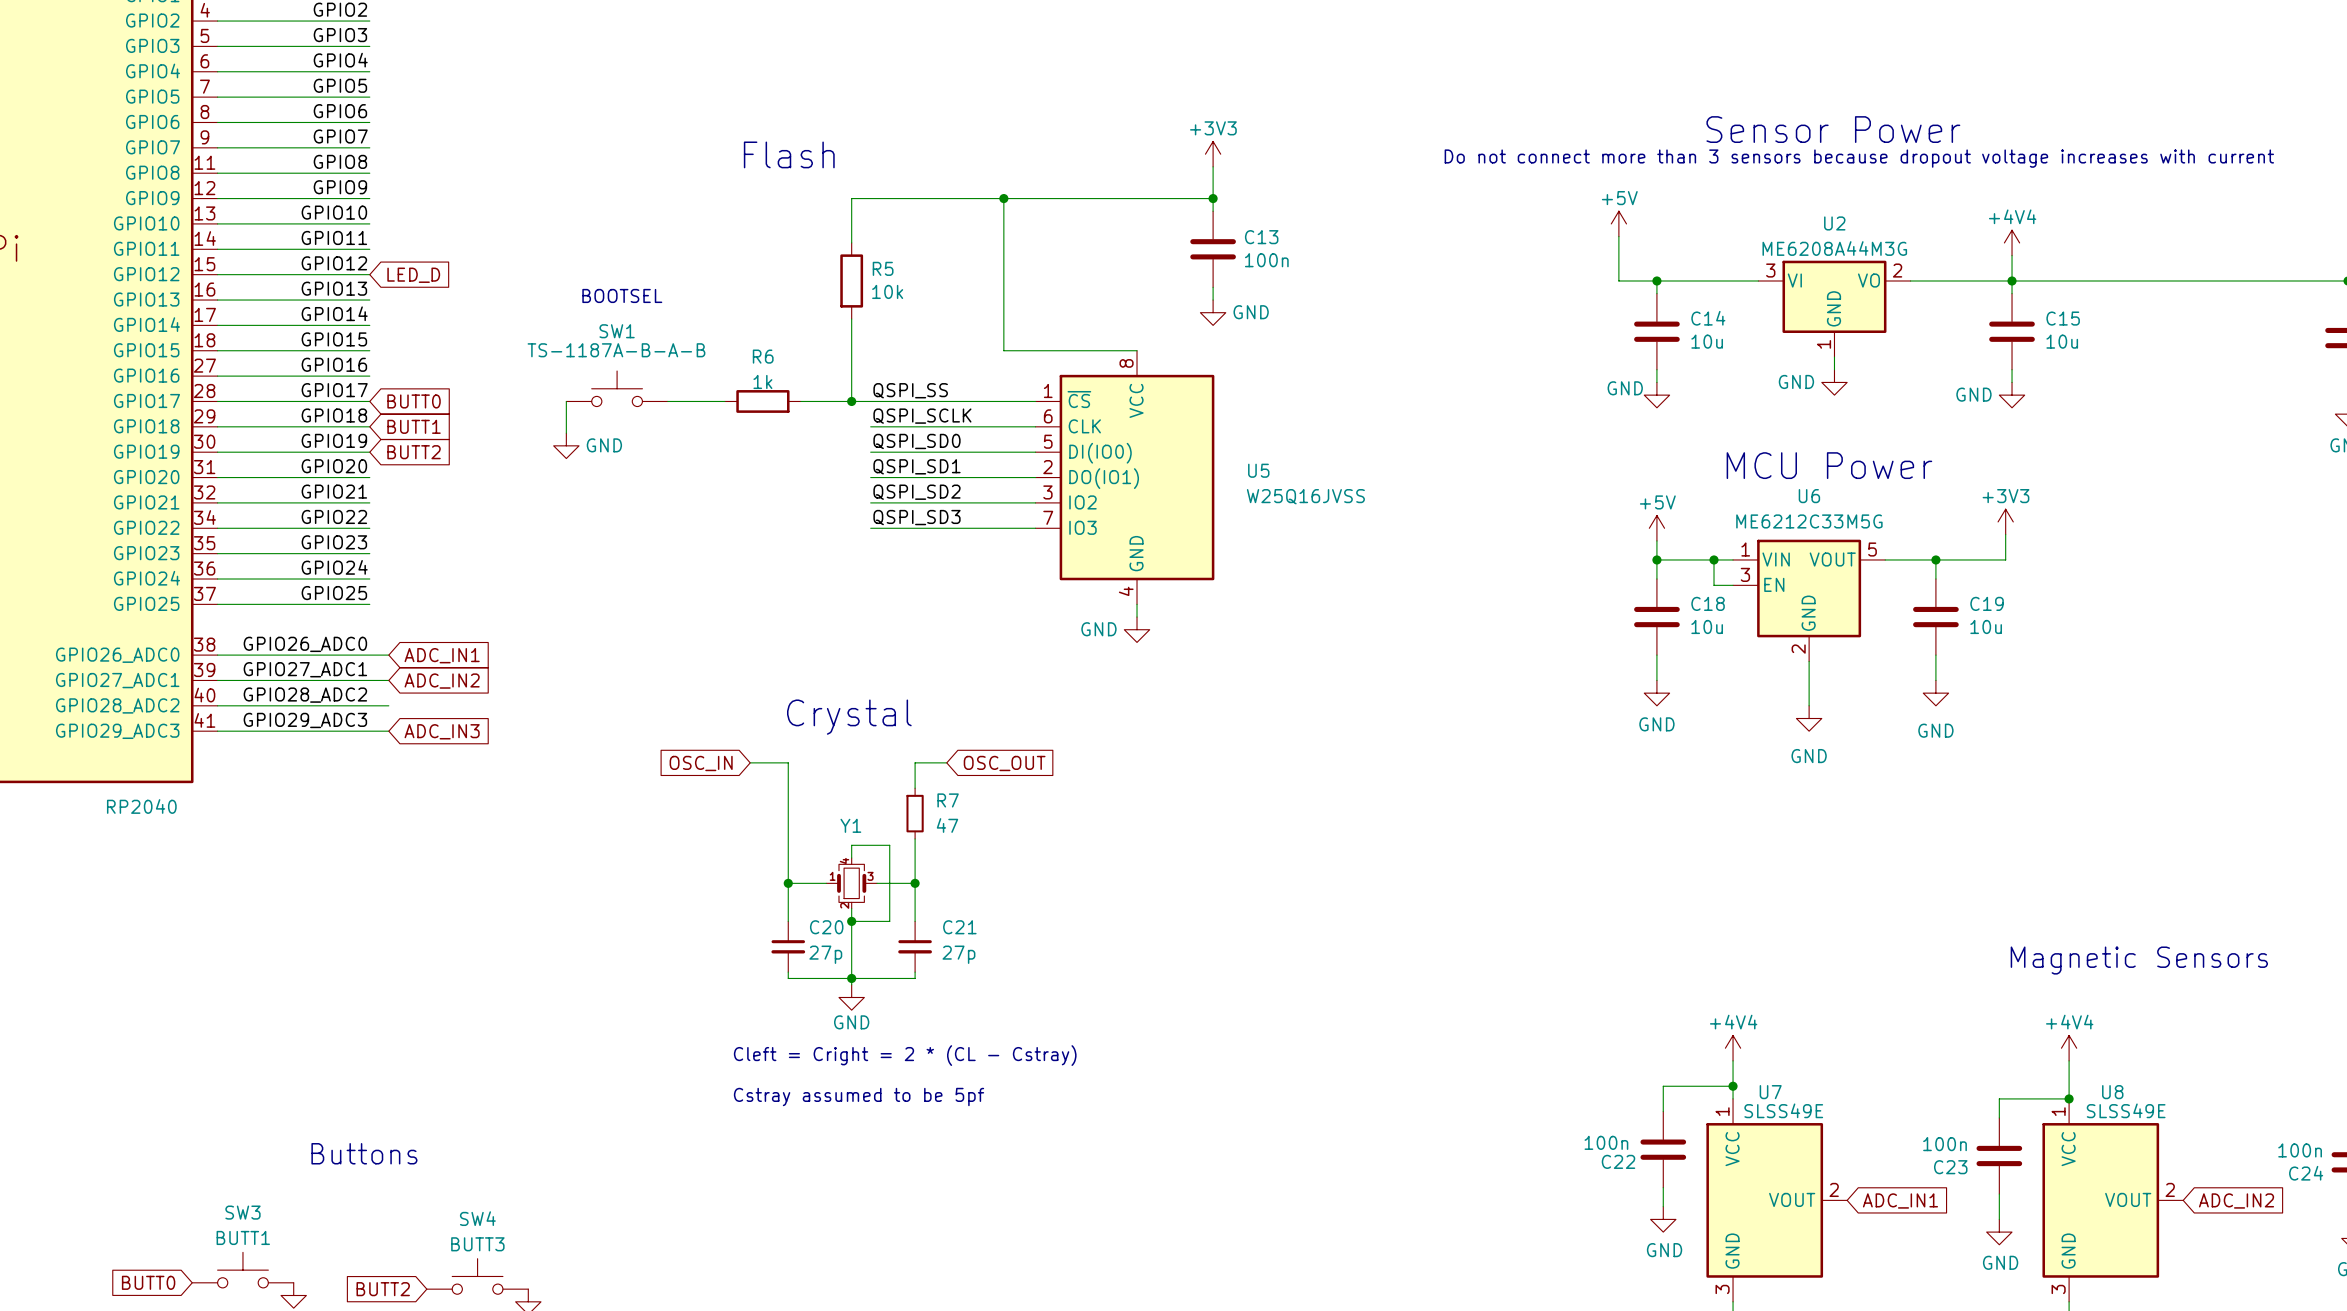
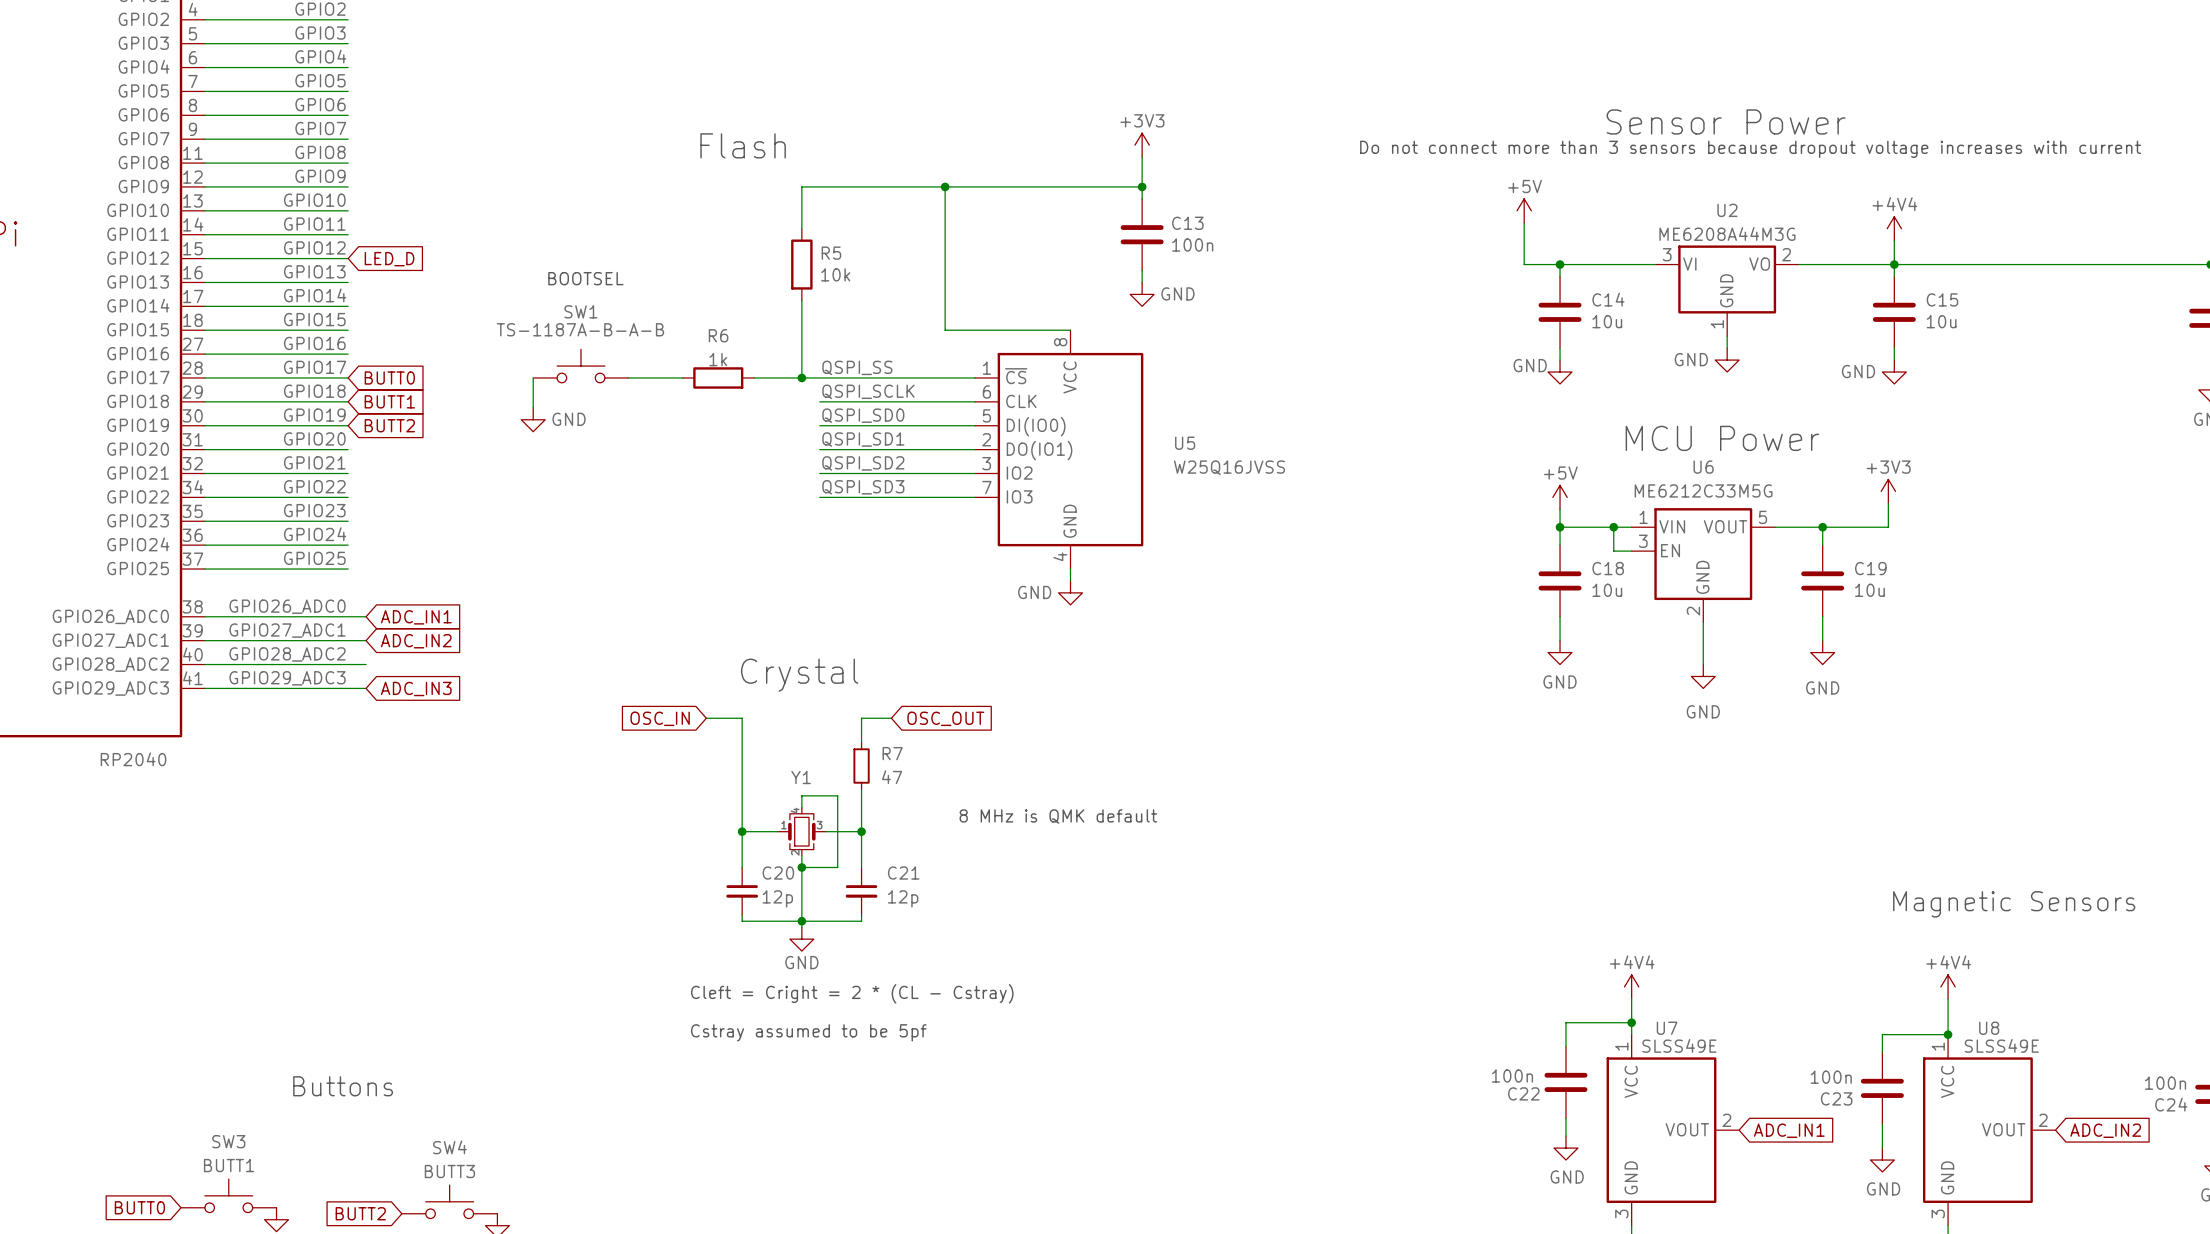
text: none -> 8 MHz is QMK default (1058, 816)
C20 value: 27p (825, 954) -> 12p (777, 898)
C21 value: 27p (958, 954) -> 12p (903, 898)

